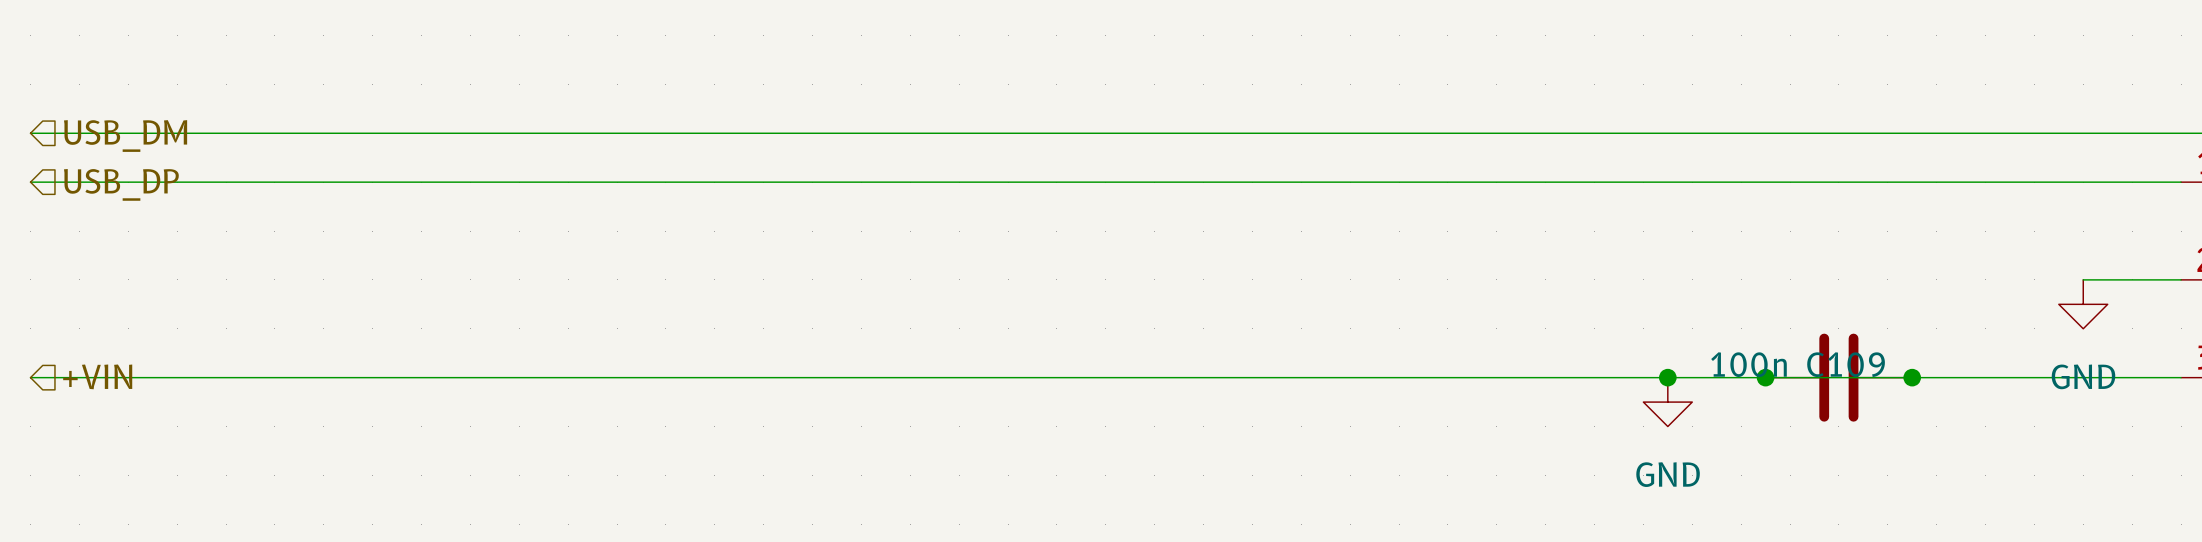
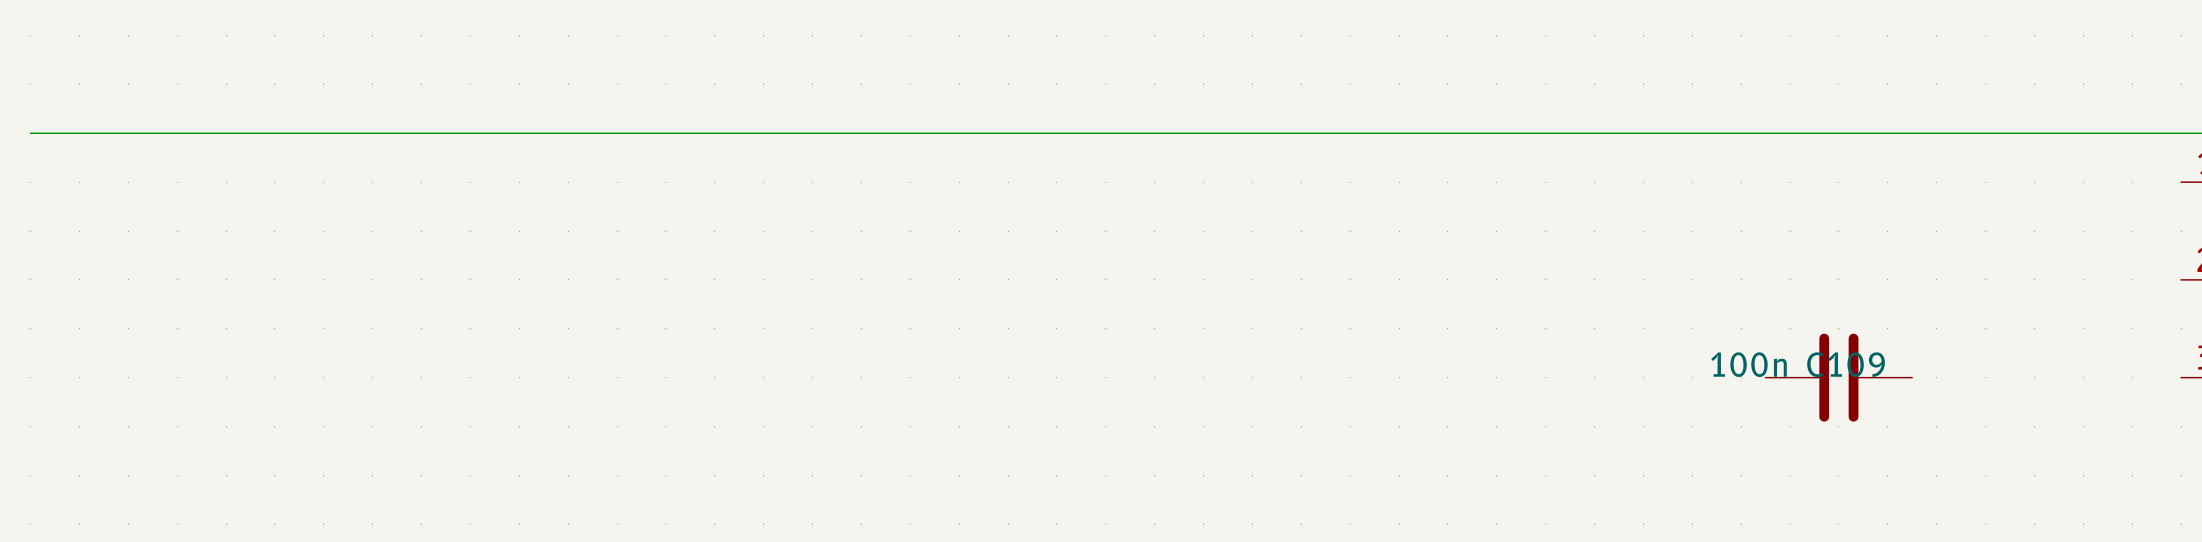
hierarchical label: USB_DM (125, 136) -> none
wire: (30, 182) (2181, 182) -> none
hierarchical label: USB_DP (121, 184) -> none
wire: (2083, 279) (2181, 279) -> none
power symbol: GND (2083, 304) -> none
hierarchical label: +VIN (97, 376) -> none
wire: (30, 377) (2181, 377) -> none
junction: (1667, 377) -> none
junction: (1765, 377) -> none
junction: (1912, 377) -> none
power symbol: GND (1667, 402) -> none

